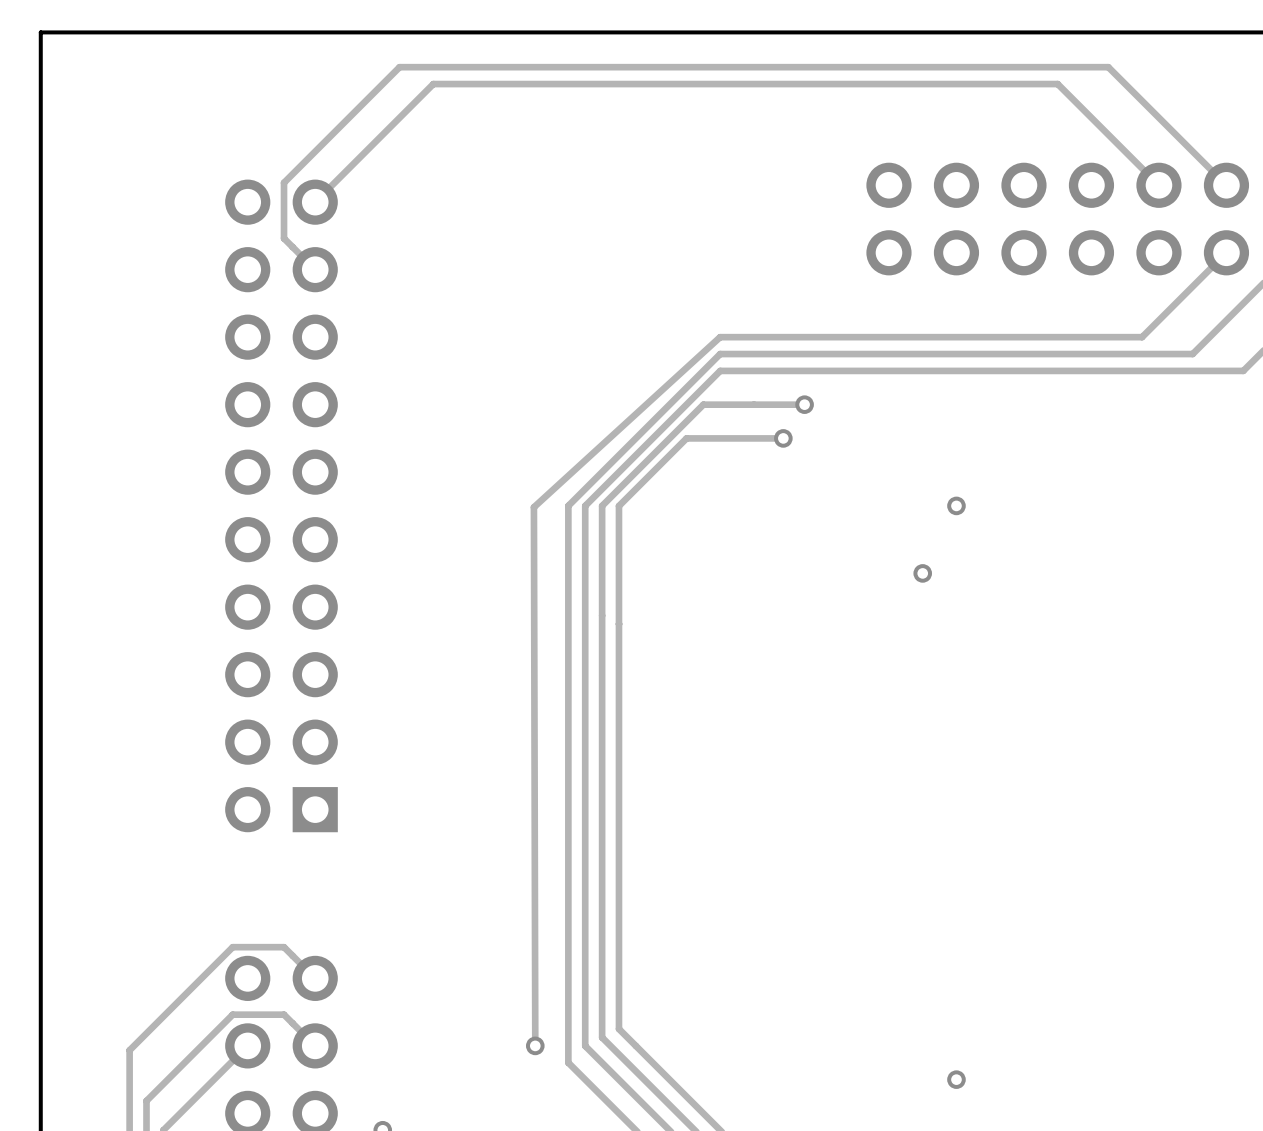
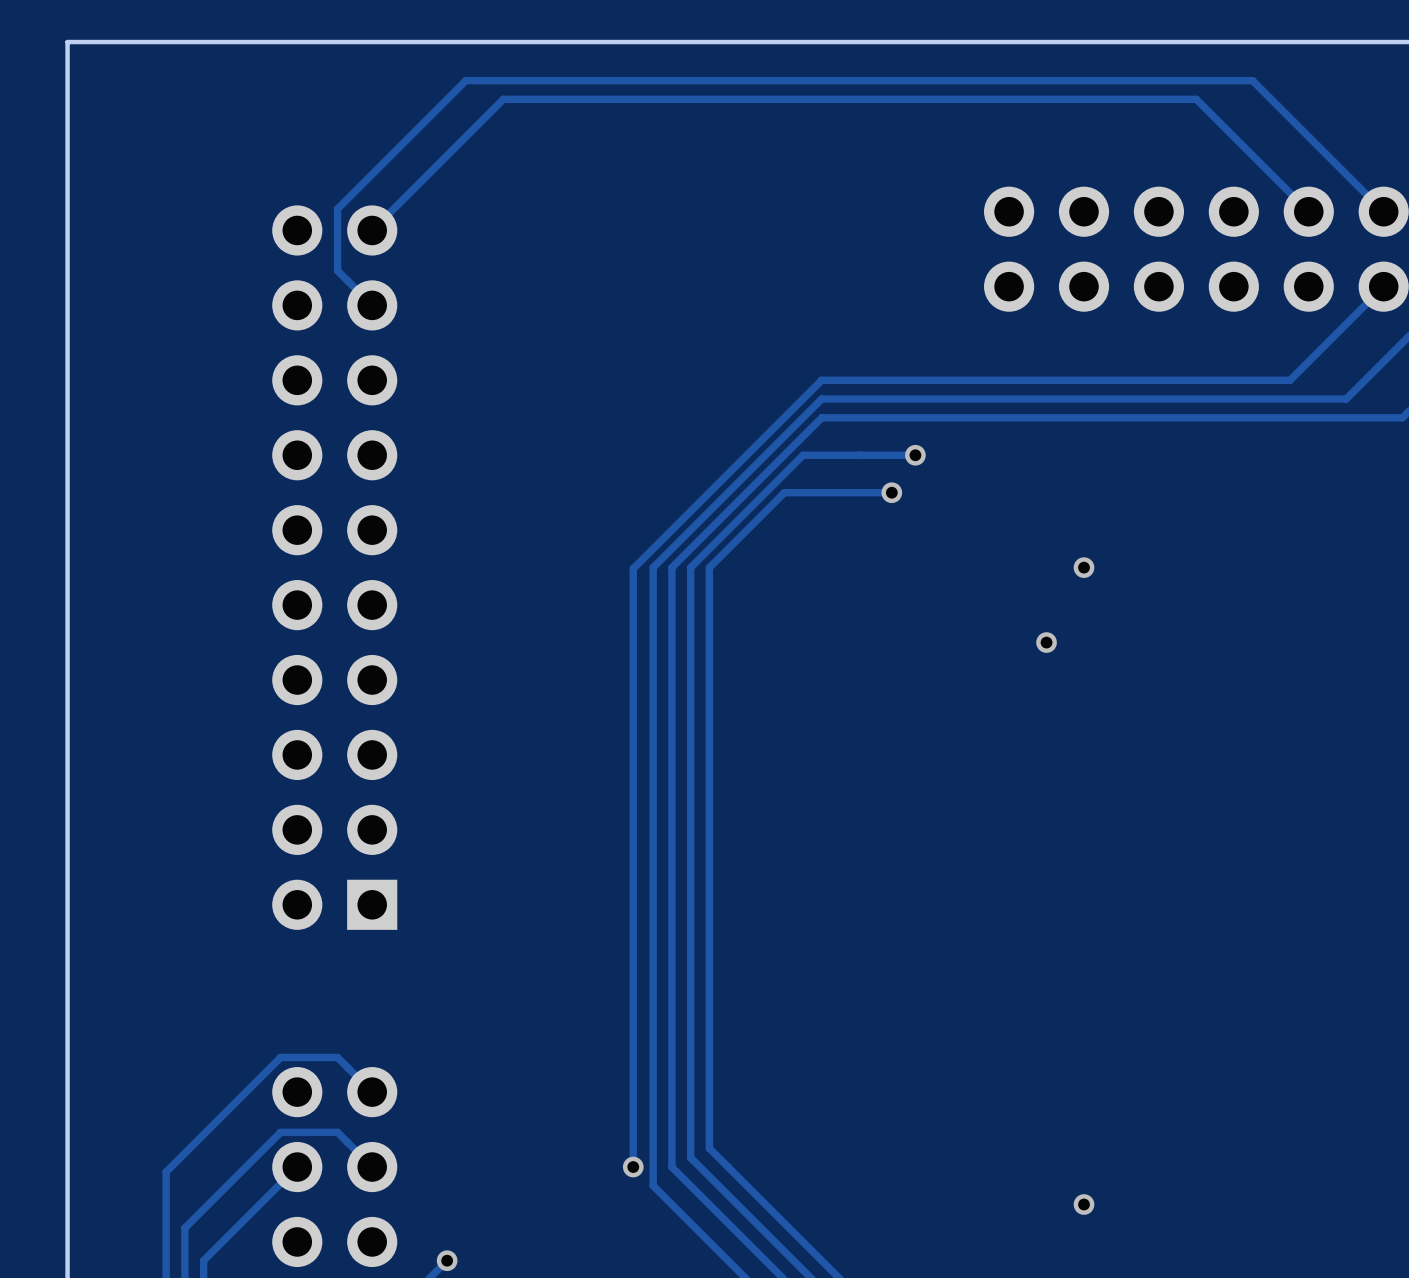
track: (720, 337) (533, 507) (535, 1045) -> (821, 380) (633, 568) (633, 1167)
via position: (535, 1045) -> (633, 1167)

